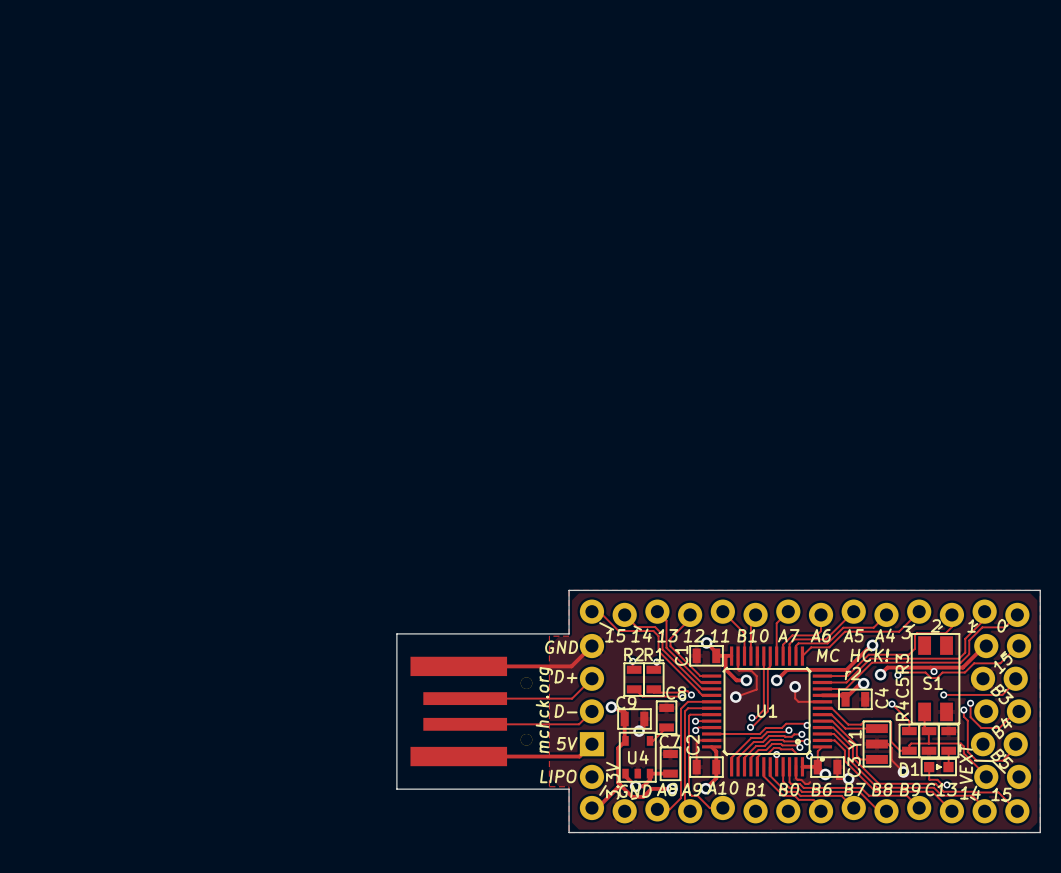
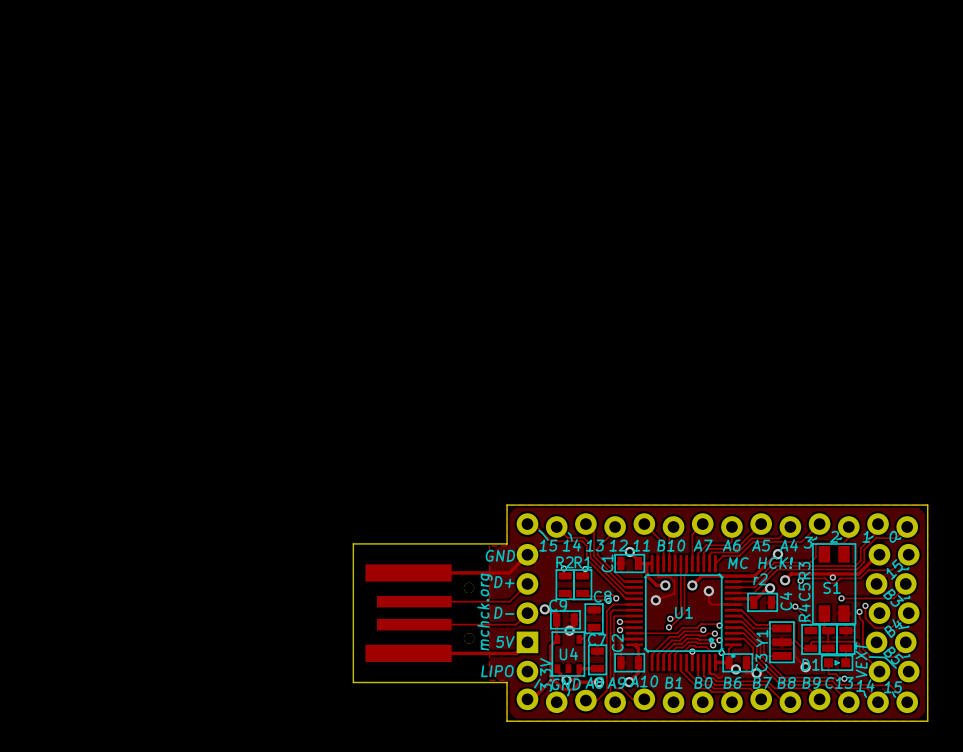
part footprint: [579, 599, 1030, 631] -> [516, 513, 919, 542]
part footprint: [973, 633, 1032, 790] -> [868, 543, 920, 683]
part footprint: [579, 784, 1030, 824] -> [516, 678, 919, 714]

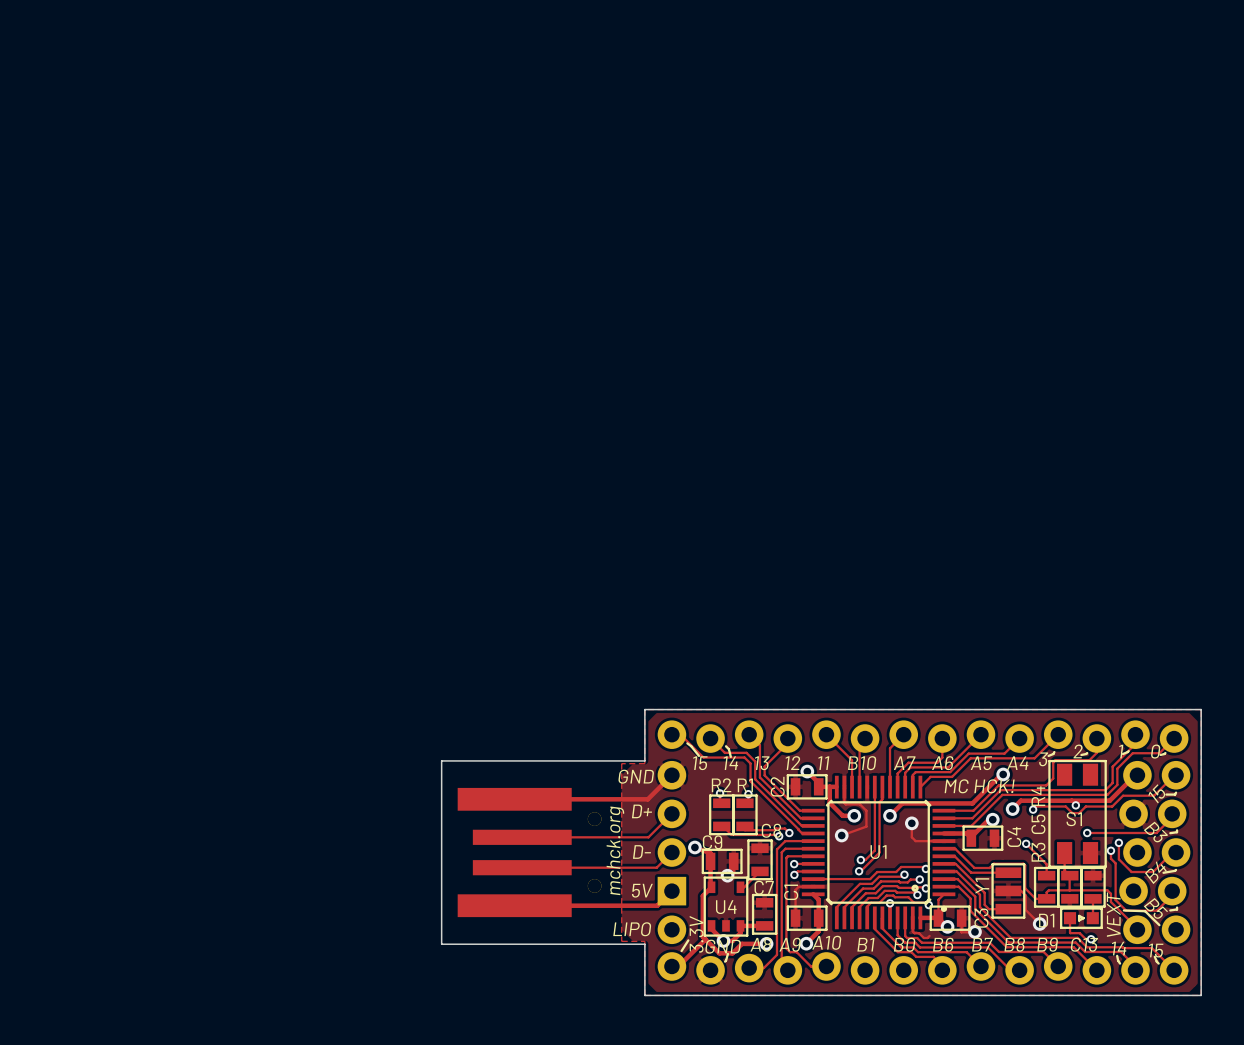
C1 name: C1 (607, 563) -> C2 (777, 786)
R3 name: R3 (804, 570) -> R4 (1038, 796)
text: r2 (760, 579) -> none
R4 name: R4 (804, 612) -> R3 (1038, 852)
C2 name: C2 (617, 643) -> C1 (791, 892)

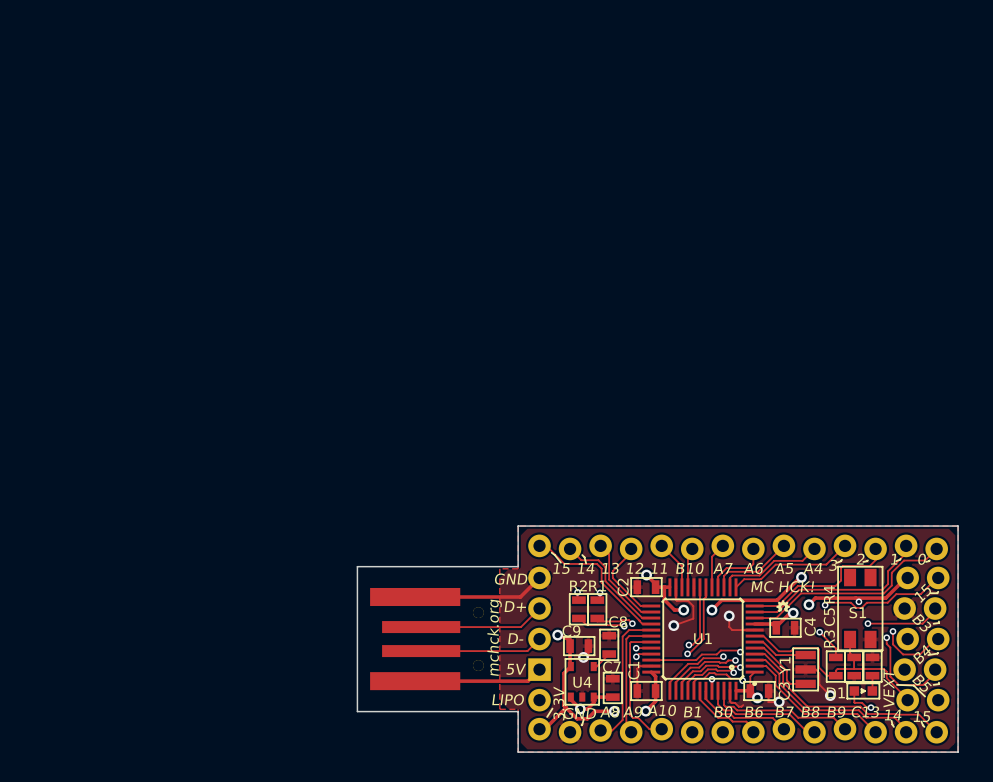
drawing: none -> [776, 600, 790, 613]

